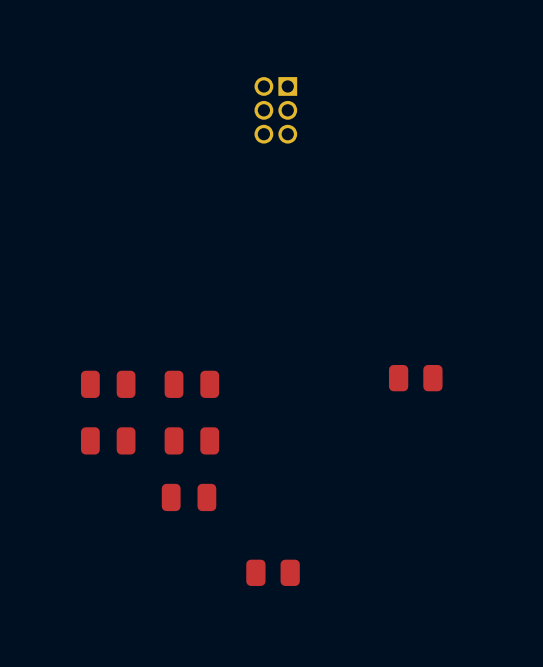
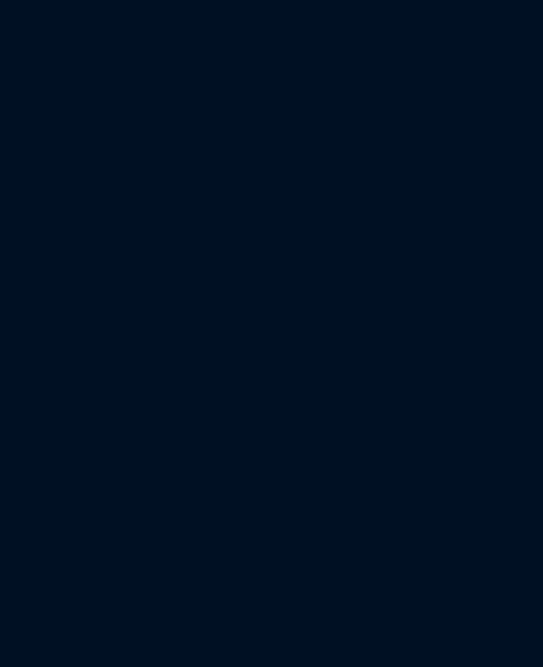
part: (275, 110) -> none
part: (415, 378) -> none
part: (108, 384) -> none
part: (191, 384) -> none
part: (108, 440) -> none
part: (191, 440) -> none
part: (189, 497) -> none
part: (273, 572) -> none

